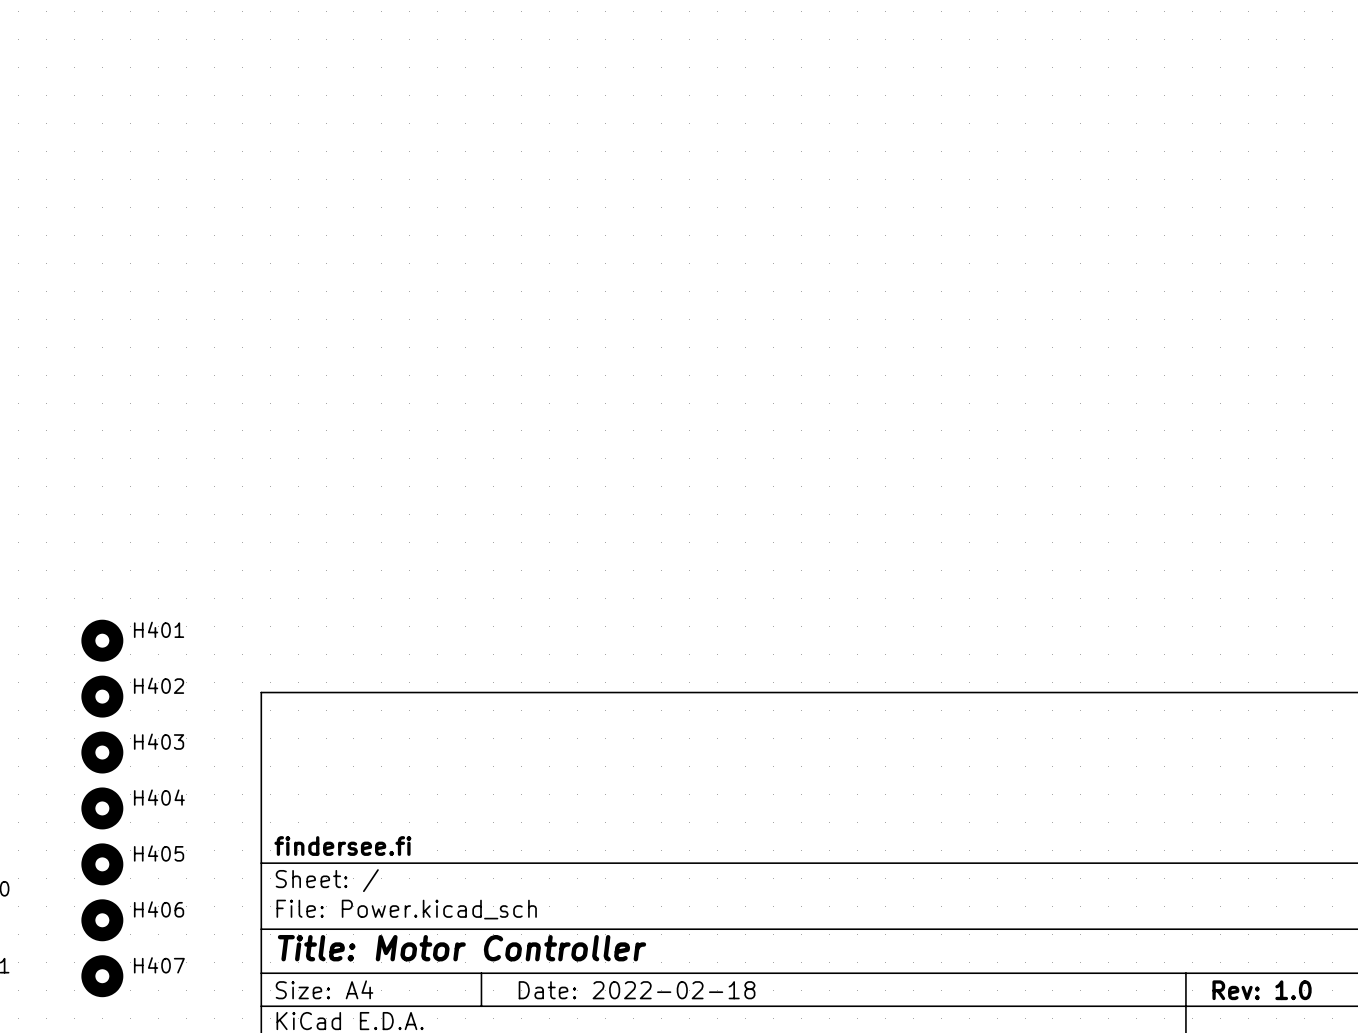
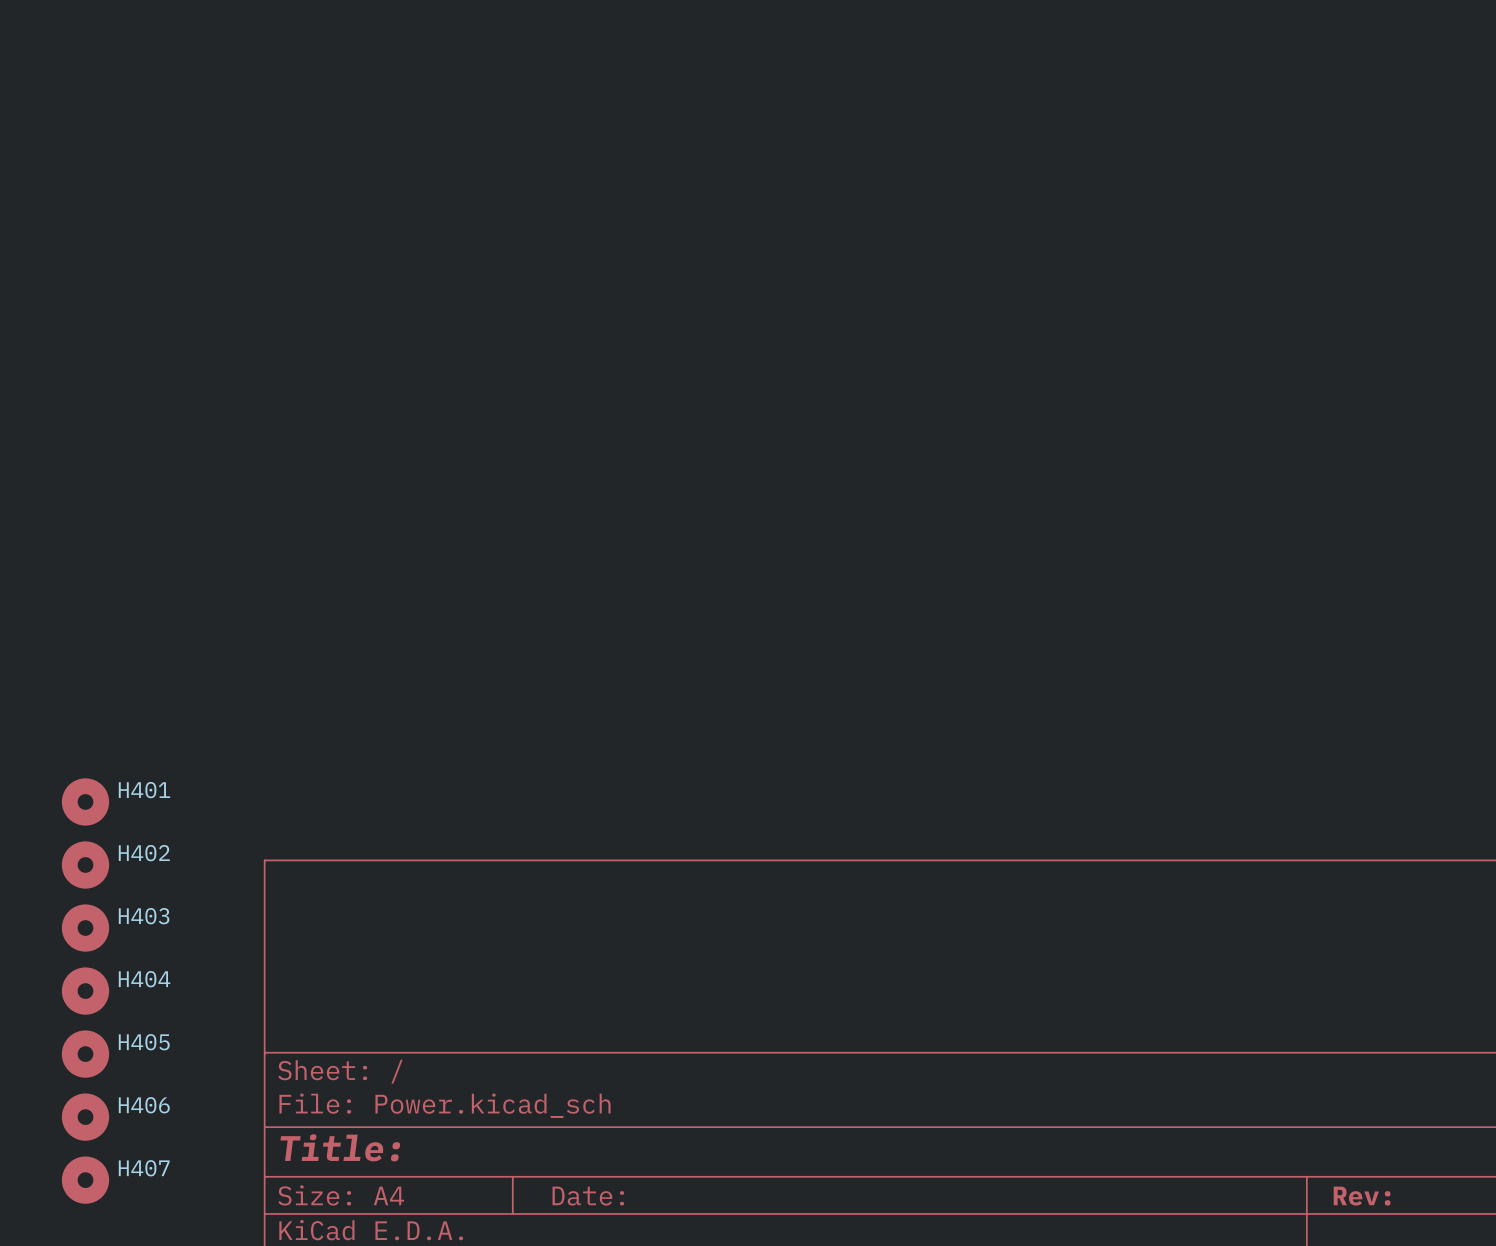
title block: findersee.fi (342, 846) -> none
title block: Title: Motor Controller (462, 948) -> Title: (340, 1147)
title block: Date: 2022-02-18 (637, 990) -> Date: (588, 1196)
title block: Rev: 1.0 (1262, 990) -> Rev: (1362, 1196)

